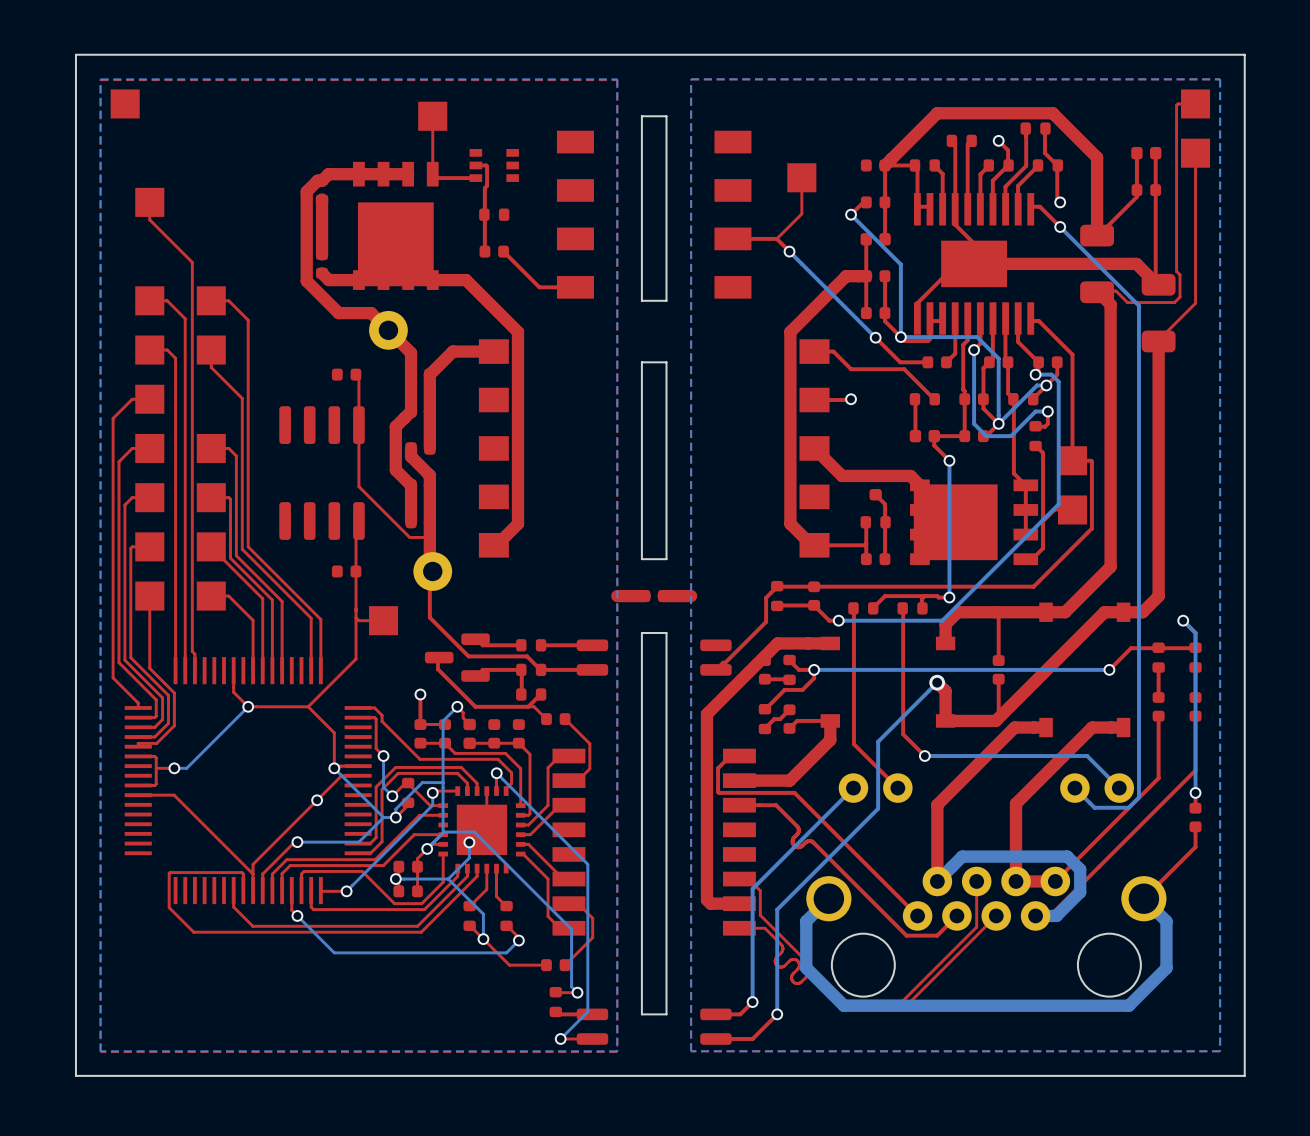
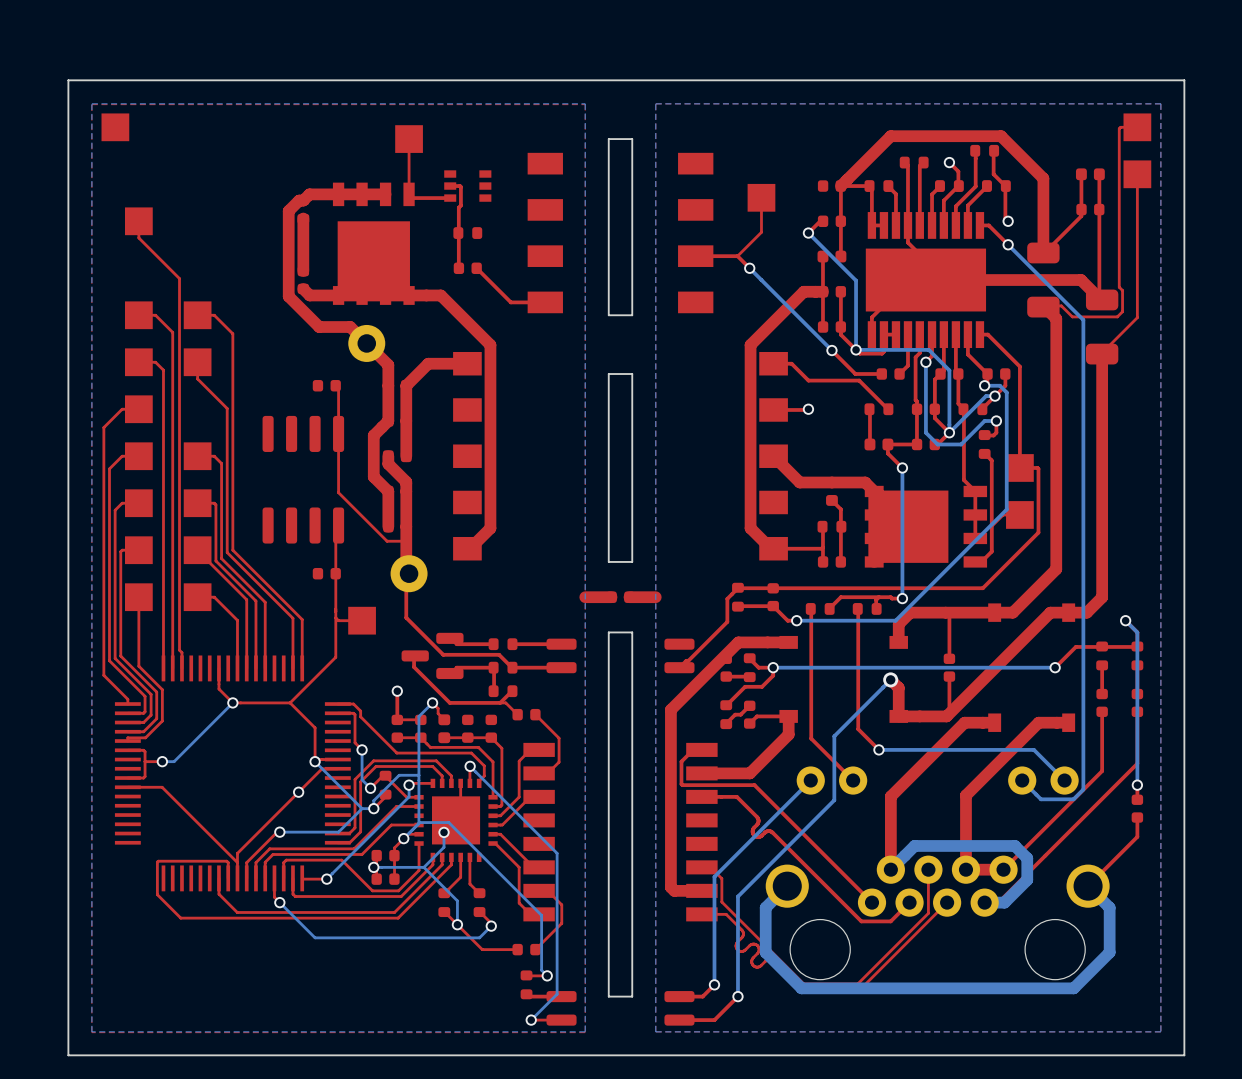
part footprint: [913, 193, 1035, 335] -> [865, 212, 987, 349]

